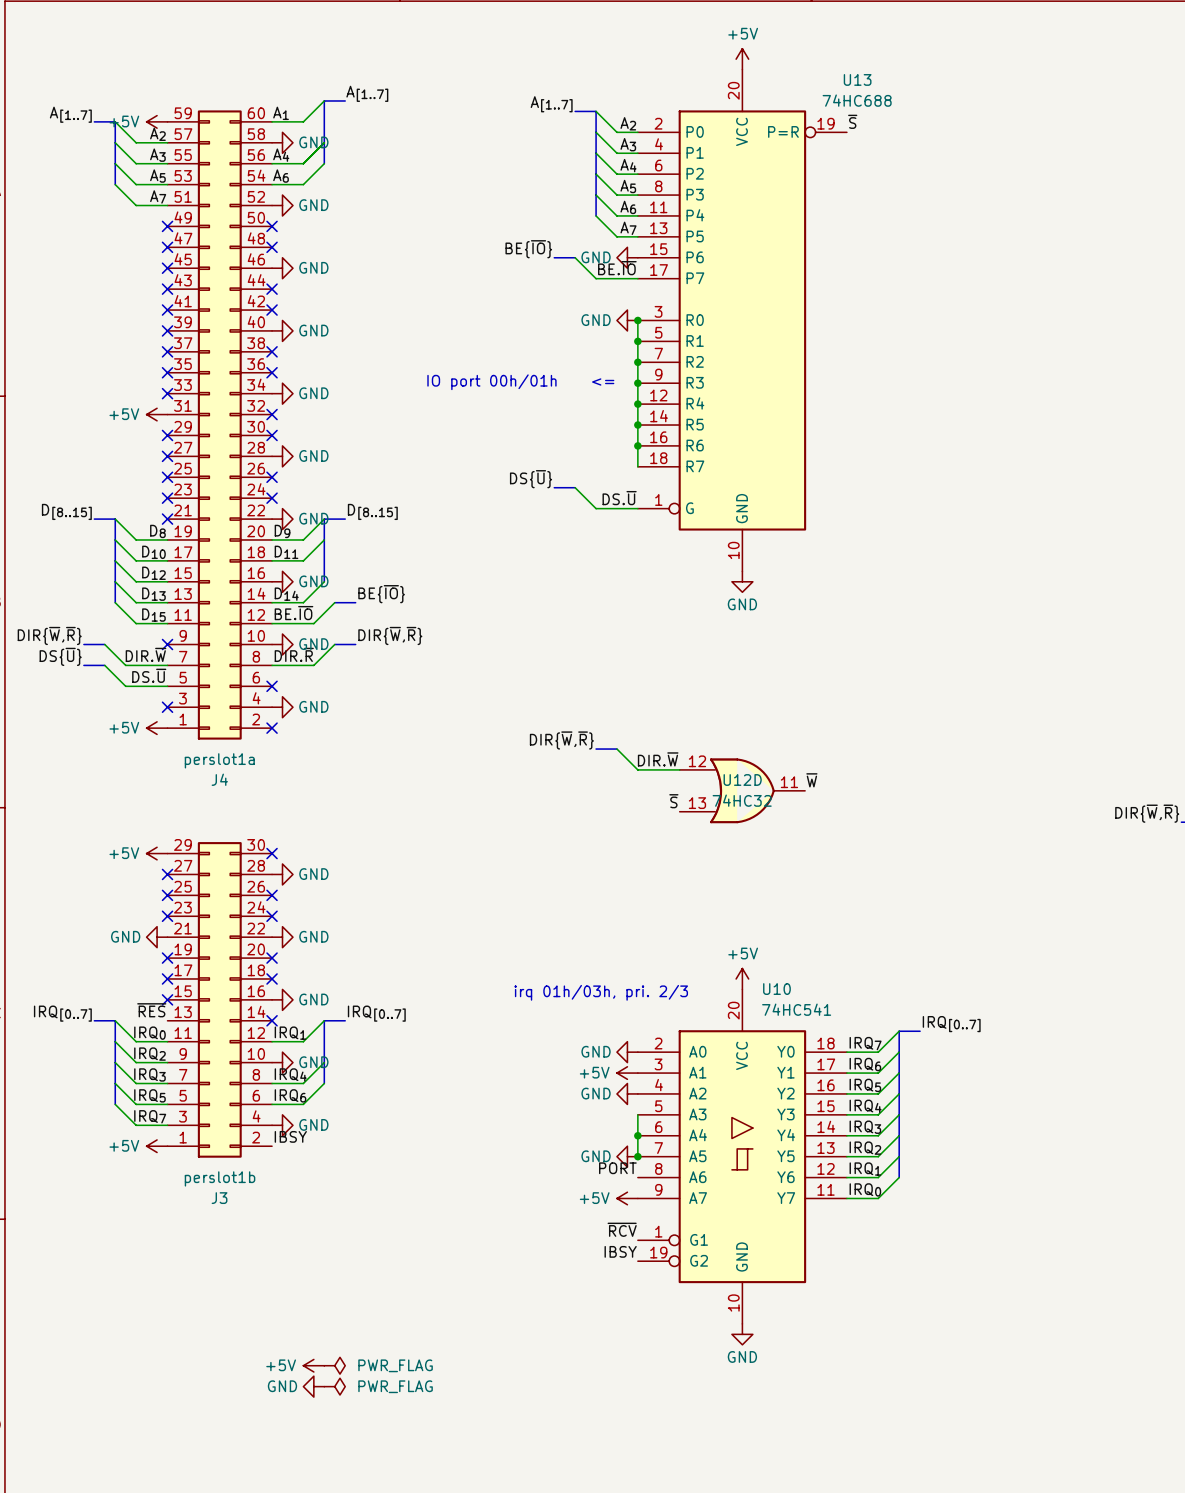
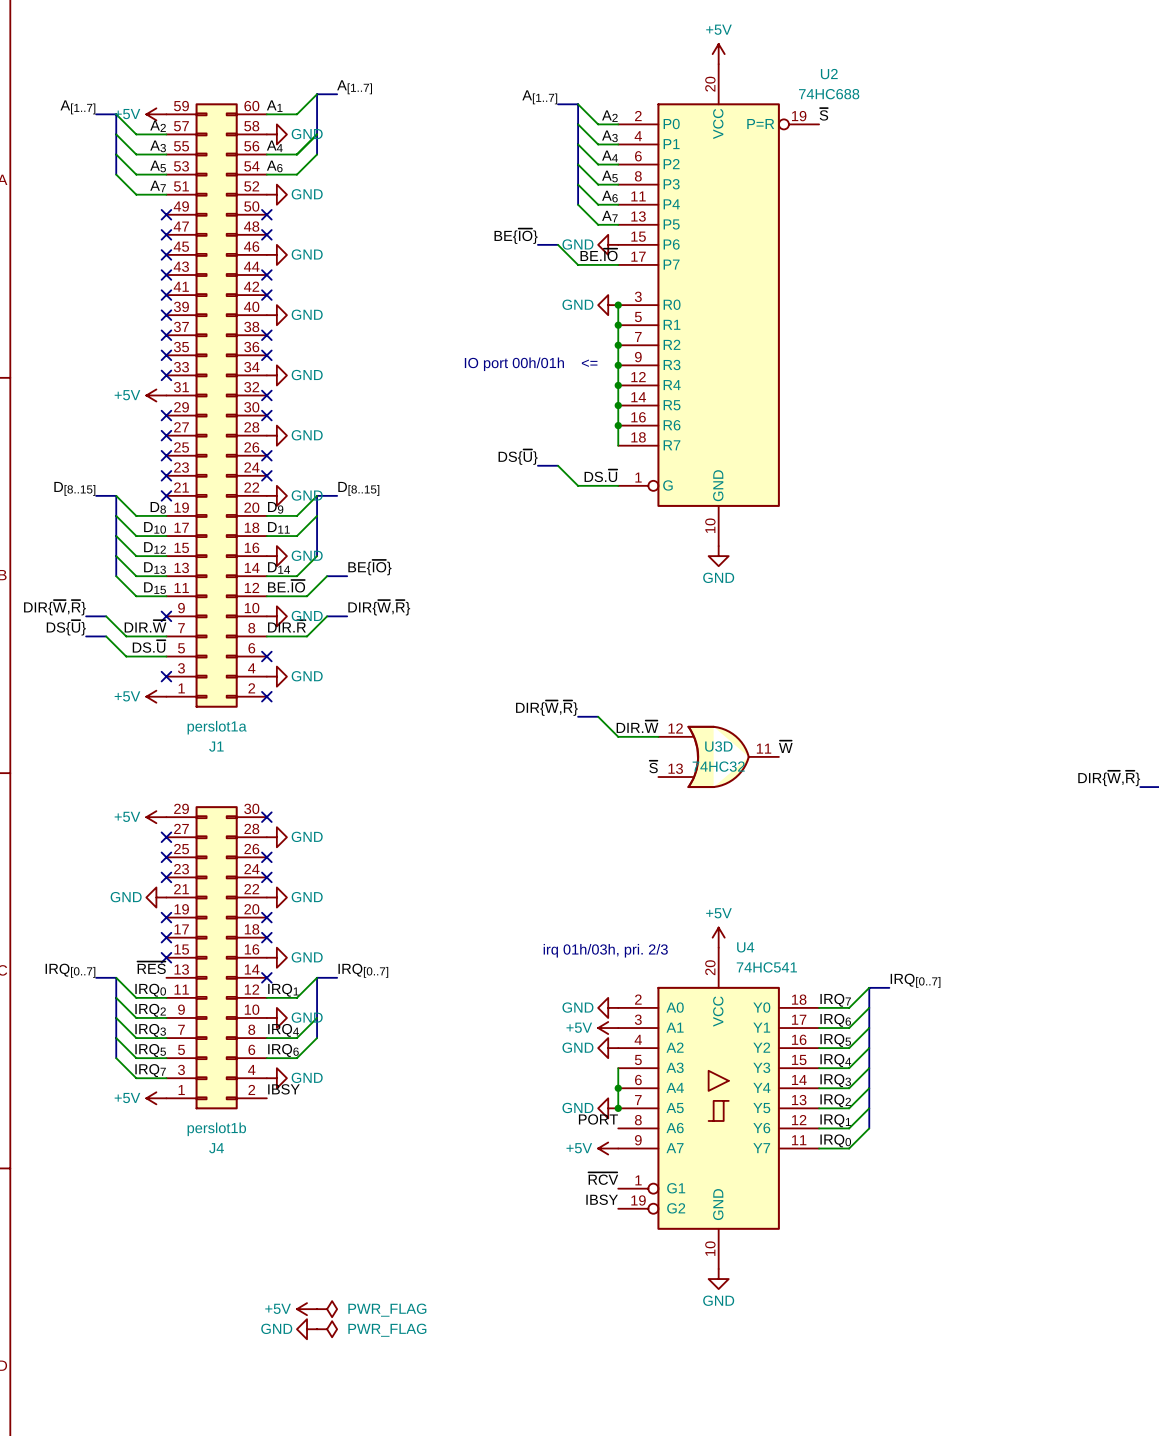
U13 name: U13 (857, 79) -> U2 (829, 74)
J4 name: J4 (219, 779) -> J1 (216, 746)
U12D name: U12D (742, 780) -> U3D (718, 746)
U10 name: U10 (776, 989) -> U4 (745, 947)
J3 name: J3 (219, 1198) -> J4 (216, 1148)

